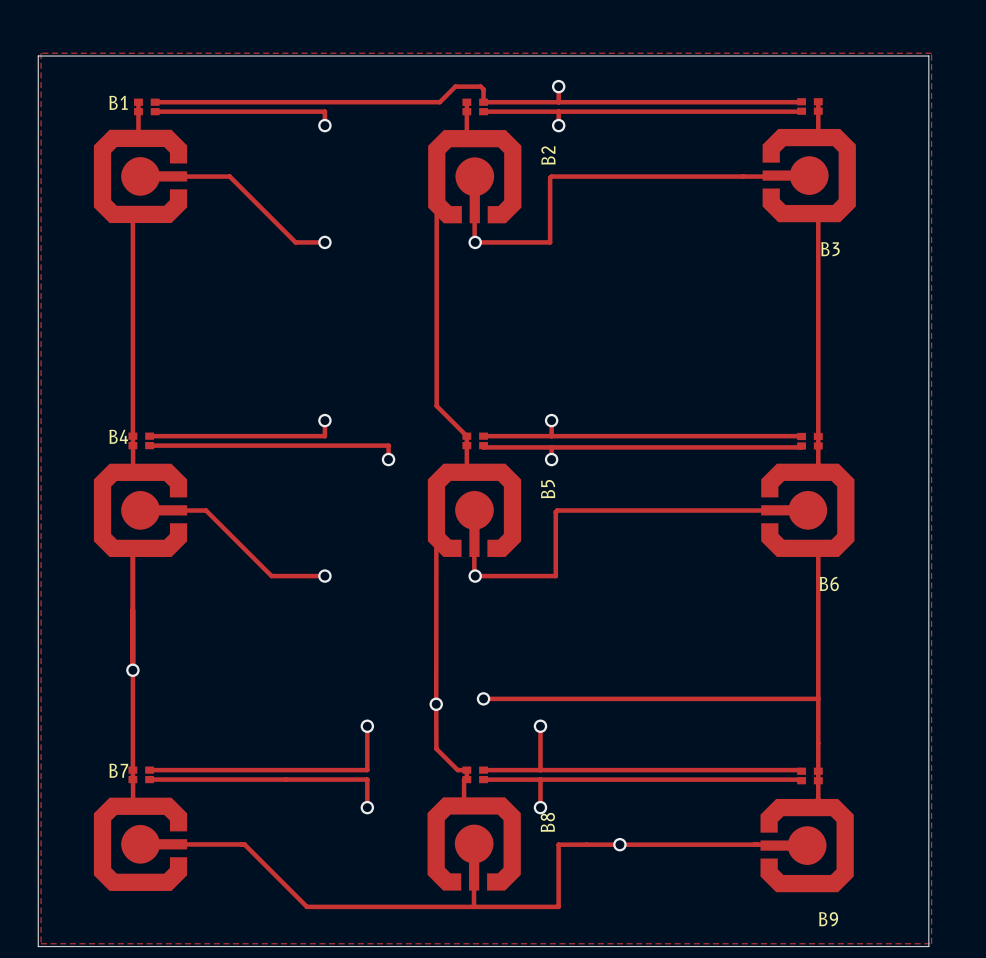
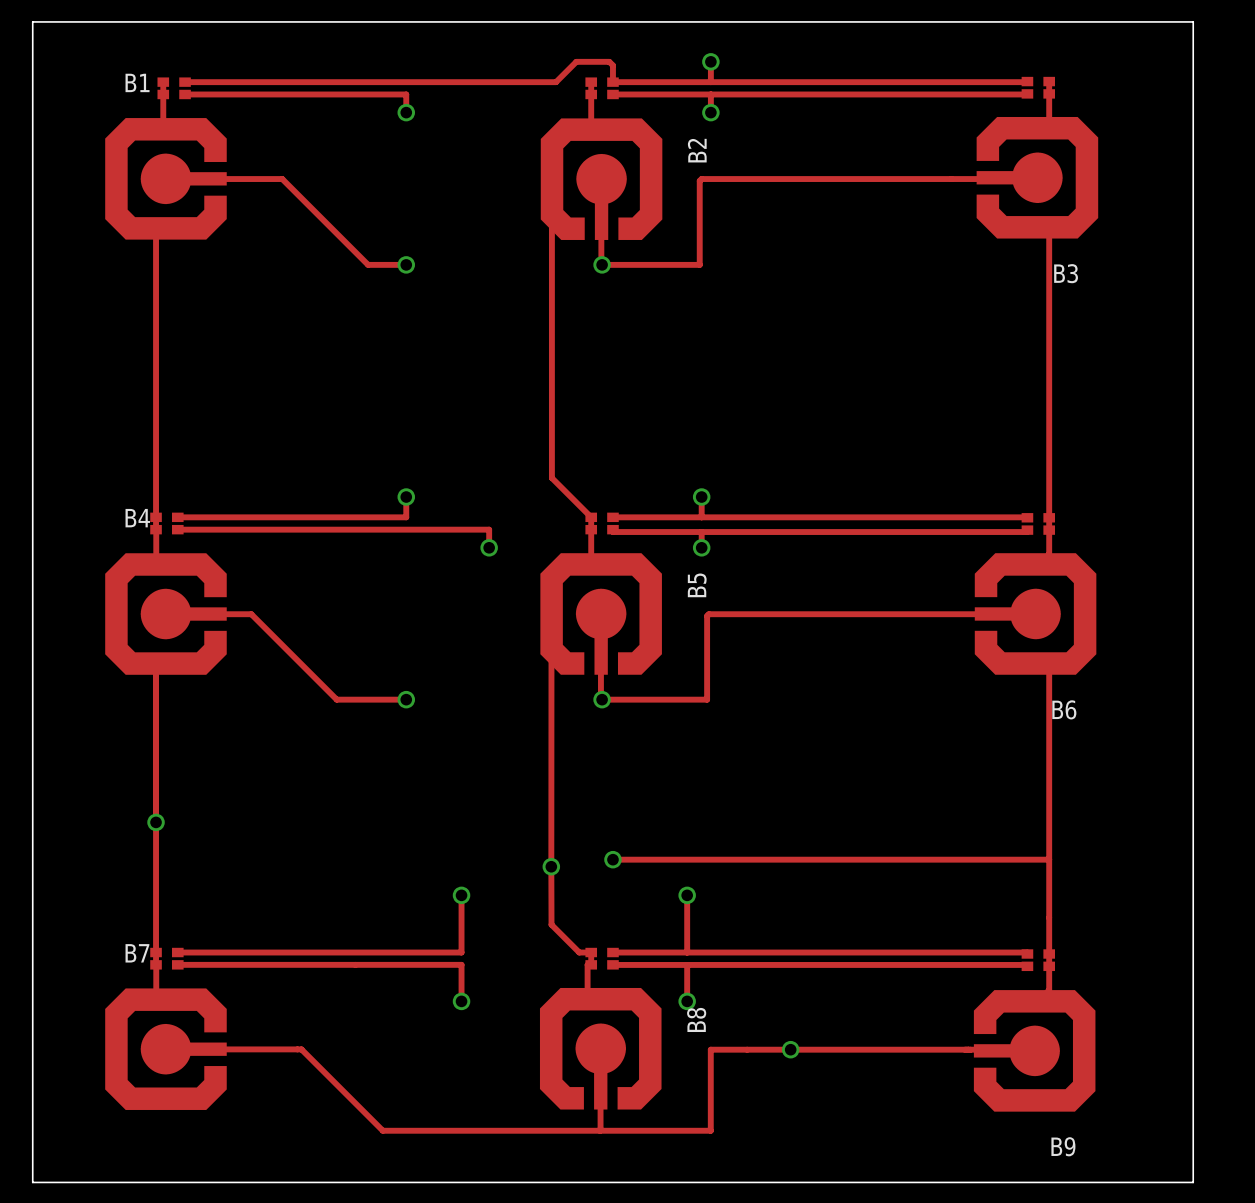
zone outline: (41, 53) (931, 53) (931, 943) (41, 943) (41, 53) -> none

